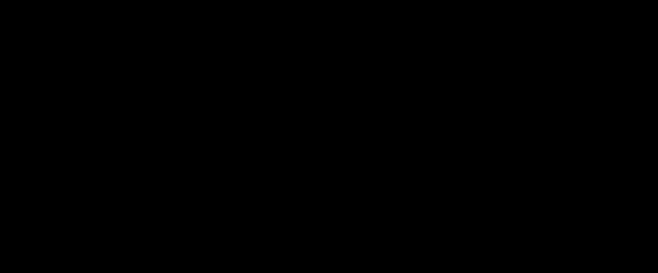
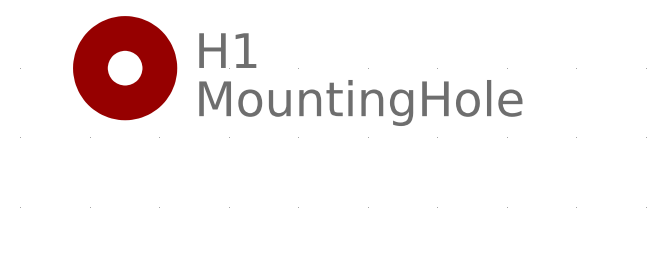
H1: none -> MountingHole (125, 68)

